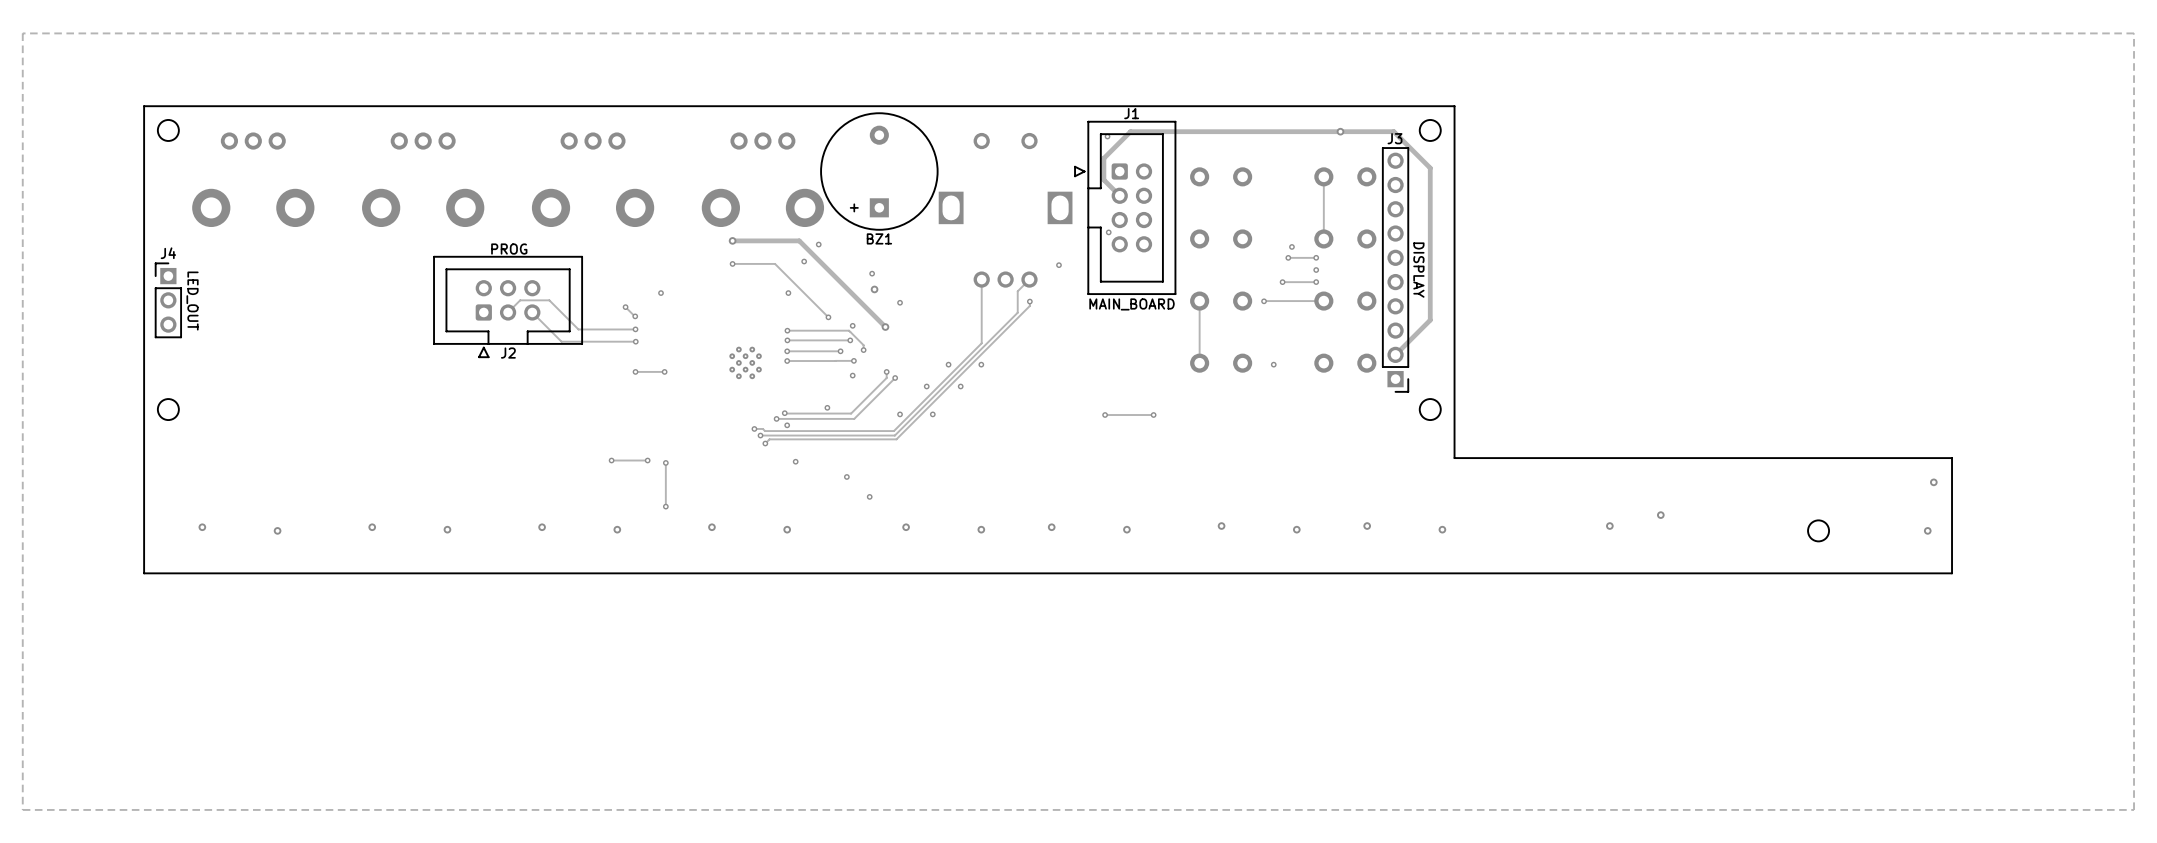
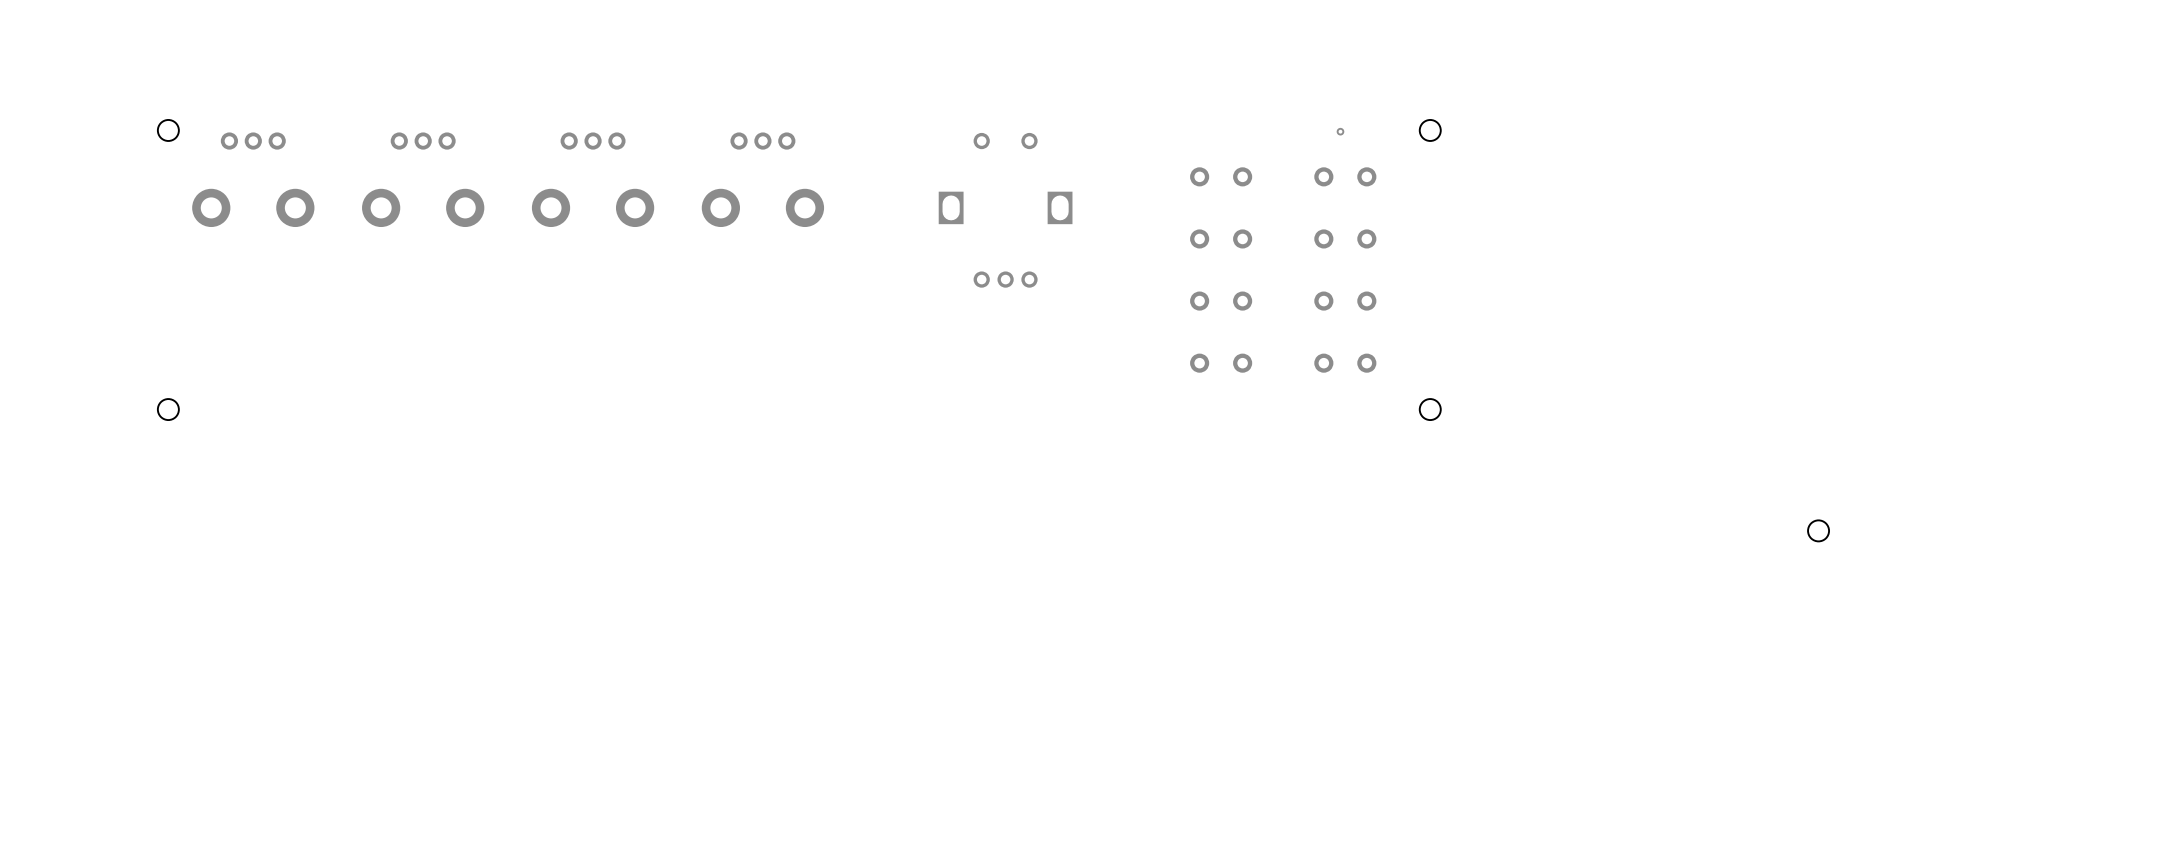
zone outline: (2134, 33) (2134, 809) (22, 809) (22, 33) (2134, 33) -> none
board edge: (1454, 106) (144, 106) (144, 573) (1952, 573) (1952, 458) (1454, 458) (1454, 106) -> none
via: (1107, 136) -> none
BZ1: (879, 171) -> none
track: (1323, 176) (1323, 238) -> none
track: (1119, 195) (1103, 179) (1103, 158) (1130, 131) (1393, 131) (1430, 168) (1430, 320) (1395, 354) -> none
J1: MAIN_BOARD (1125, 207) -> none
via: (1108, 232) -> none
track: (732, 240) (799, 240) (885, 327) -> none
via: (732, 240) -> none
via: (818, 244) -> none
via: (1291, 246) -> none
via: (1288, 257) -> none
track: (1316, 257) (1288, 257) -> none
via: (1316, 257) -> none
via: (804, 261) -> none
track: (732, 263) (775, 263) (828, 317) -> none
via: (732, 263) -> none
via: (1058, 265) -> none
J3: DISPLAY (1395, 269) -> none
via: (1316, 270) -> none
via: (872, 273) -> none
track: (981, 279) (981, 343) (893, 431) (765, 431) (762, 428) (754, 428) -> none
track: (1029, 279) (1017, 291) (1017, 312) (894, 435) (760, 435) -> none
via: (1282, 282) -> none
track: (1316, 282) (1282, 282) -> none
via: (1316, 282) -> none
via: (874, 289) -> none
via: (661, 293) -> none
via: (788, 293) -> none
J4: LED_OUT (168, 300) -> none
track: (1029, 301) (1029, 305) (896, 439) (769, 439) (765, 443) -> none
via: (1029, 301) -> none
track: (1199, 301) (1199, 363) -> none
via: (1264, 301) -> none
track: (1323, 301) (1264, 301) -> none
via: (900, 302) -> none
J2: PROG (508, 306) -> none
track: (625, 307) (635, 316) -> none
via: (625, 307) -> none
track: (508, 312) (520, 300) (549, 300) (578, 329) (635, 329) -> none
track: (532, 312) (561, 341) (635, 341) -> none
via: (635, 316) -> none
via: (828, 317) -> none
via: (852, 325) -> none
via: (885, 327) -> none
via: (635, 329) -> none
track: (787, 330) (849, 330) (863, 345) (863, 350) -> none
via: (787, 330) -> none
via: (787, 340) -> none
track: (850, 340) (787, 340) -> none
via: (850, 340) -> none
via: (635, 341) -> none
via: (863, 350) -> none
via: (787, 351) -> none
track: (840, 351) (787, 351) -> none
via: (840, 351) -> none
track: (853, 360) (835, 360) -> none
via: (853, 360) -> none
via: (787, 361) -> none
track: (835, 361) (787, 361) -> none
part: (745, 362) -> none
via: (948, 364) -> none
via: (981, 364) -> none
via: (1273, 364) -> none
via: (635, 371) -> none
track: (664, 371) (635, 371) -> none
via: (664, 371) -> none
track: (886, 371) (886, 378) (851, 413) (784, 413) -> none
via: (886, 371) -> none
via: (852, 375) -> none
track: (895, 378) (854, 418) (776, 418) -> none
via: (895, 378) -> none
via: (926, 386) -> none
via: (960, 386) -> none
via: (827, 407) -> none
via: (784, 413) -> none
via: (900, 414) -> none
via: (932, 414) -> none
via: (1105, 415) -> none
track: (1153, 415) (1105, 415) -> none
via: (1153, 415) -> none
via: (776, 418) -> none
via: (787, 425) -> none
via: (754, 428) -> none
via: (760, 435) -> none
via: (765, 443) -> none
via: (611, 460) -> none
track: (647, 460) (611, 460) -> none
via: (647, 460) -> none
via: (795, 461) -> none
track: (665, 462) (665, 506) -> none
via: (665, 462) -> none
via: (846, 476) -> none
via: (1933, 482) -> none
via: (869, 496) -> none
via: (665, 506) -> none
via: (1660, 515) -> none
via: (1221, 526) -> none
via: (1367, 526) -> none
via: (1609, 526) -> none
via: (202, 527) -> none
via: (372, 527) -> none
via: (542, 527) -> none
via: (711, 527) -> none
via: (906, 527) -> none
via: (1051, 527) -> none
via: (447, 529) -> none
via: (617, 529) -> none
via: (787, 529) -> none
via: (981, 529) -> none
via: (1126, 529) -> none
via: (1296, 529) -> none
via: (1442, 529) -> none
via: (277, 530) -> none
via: (1927, 530) -> none

